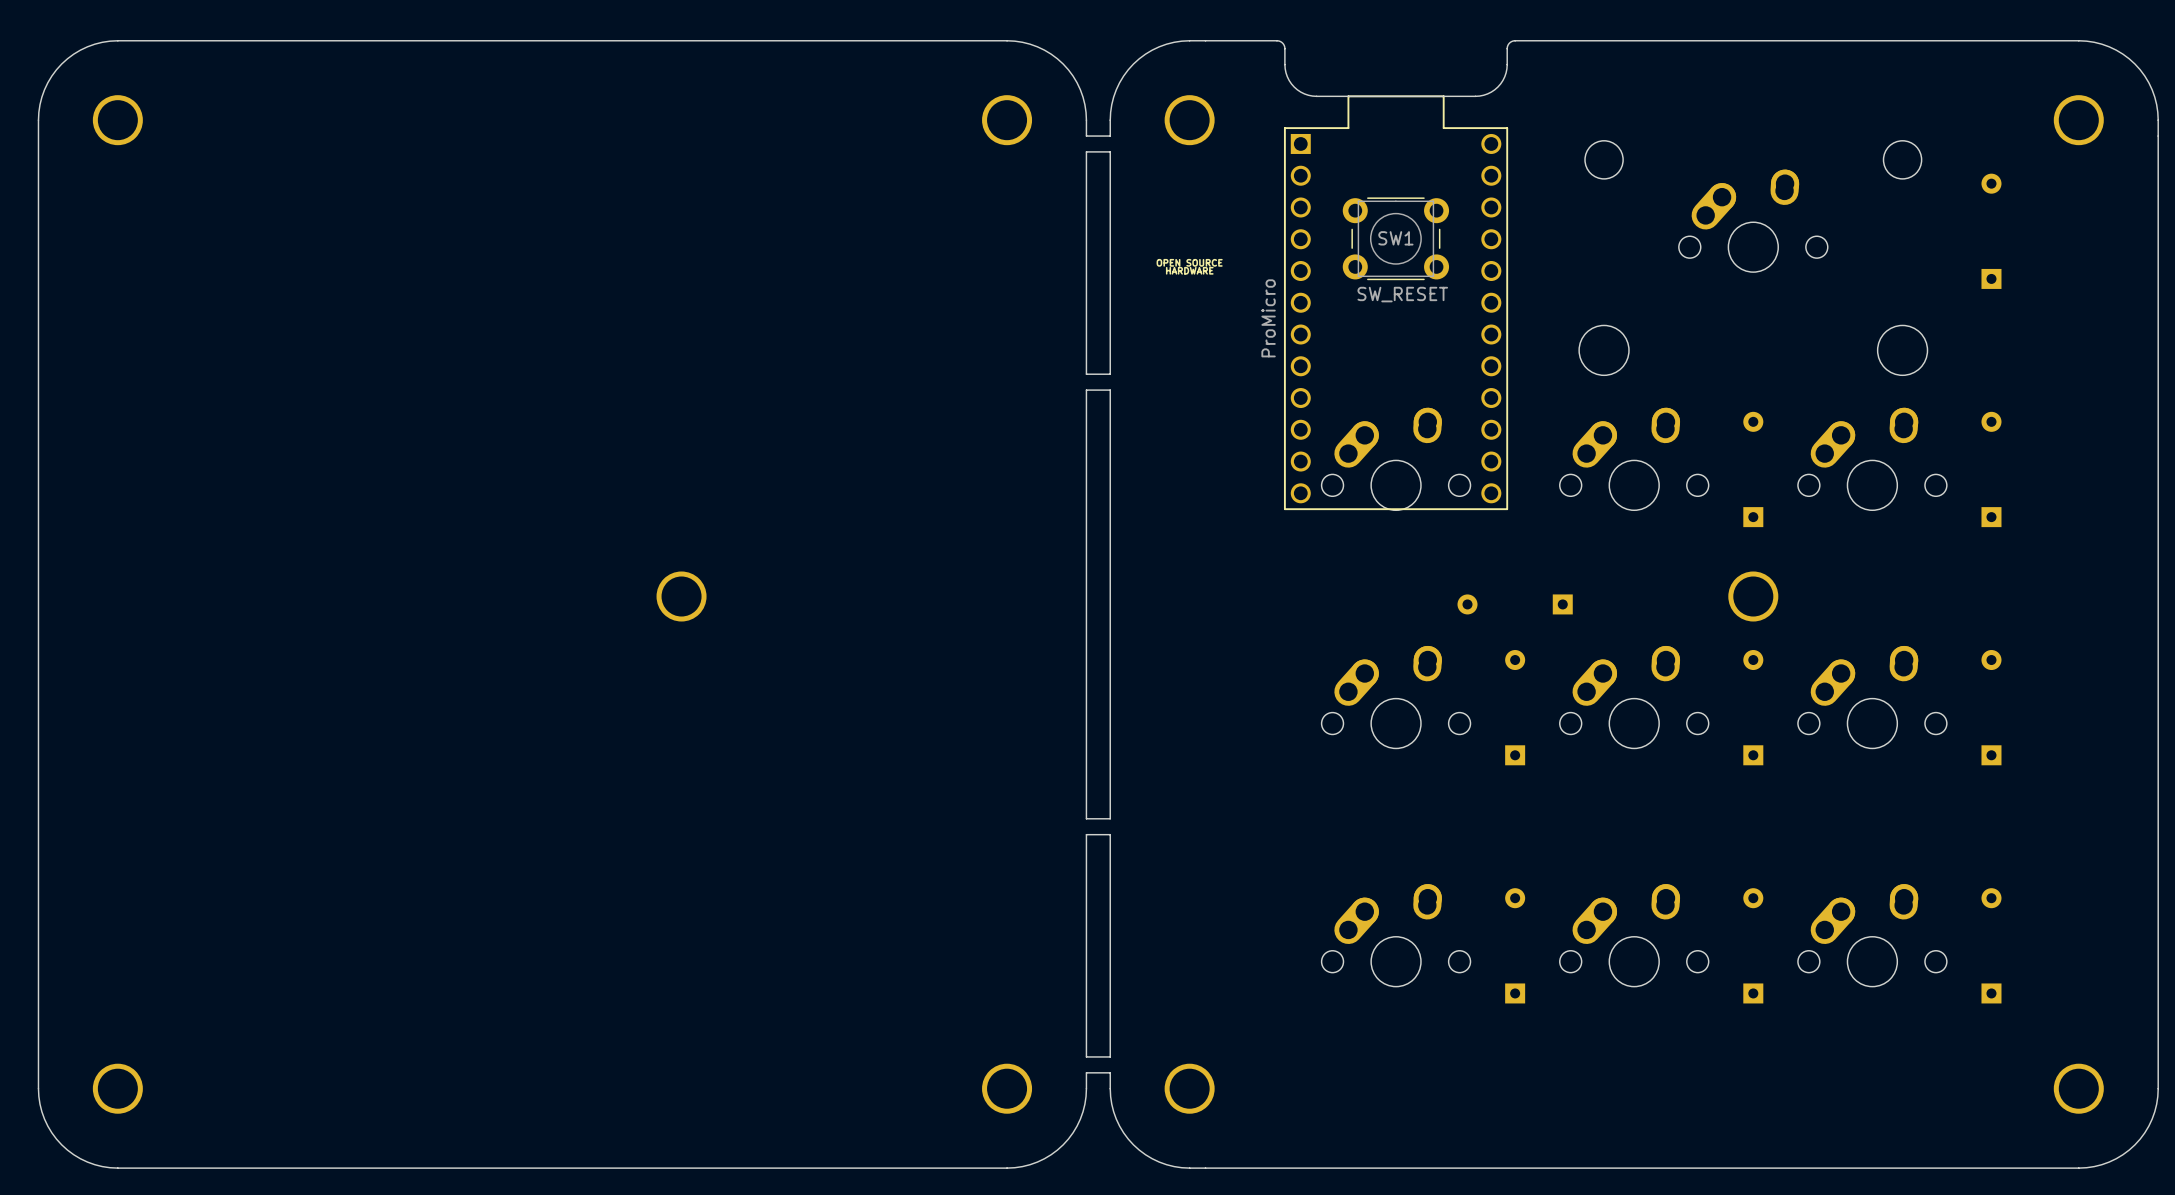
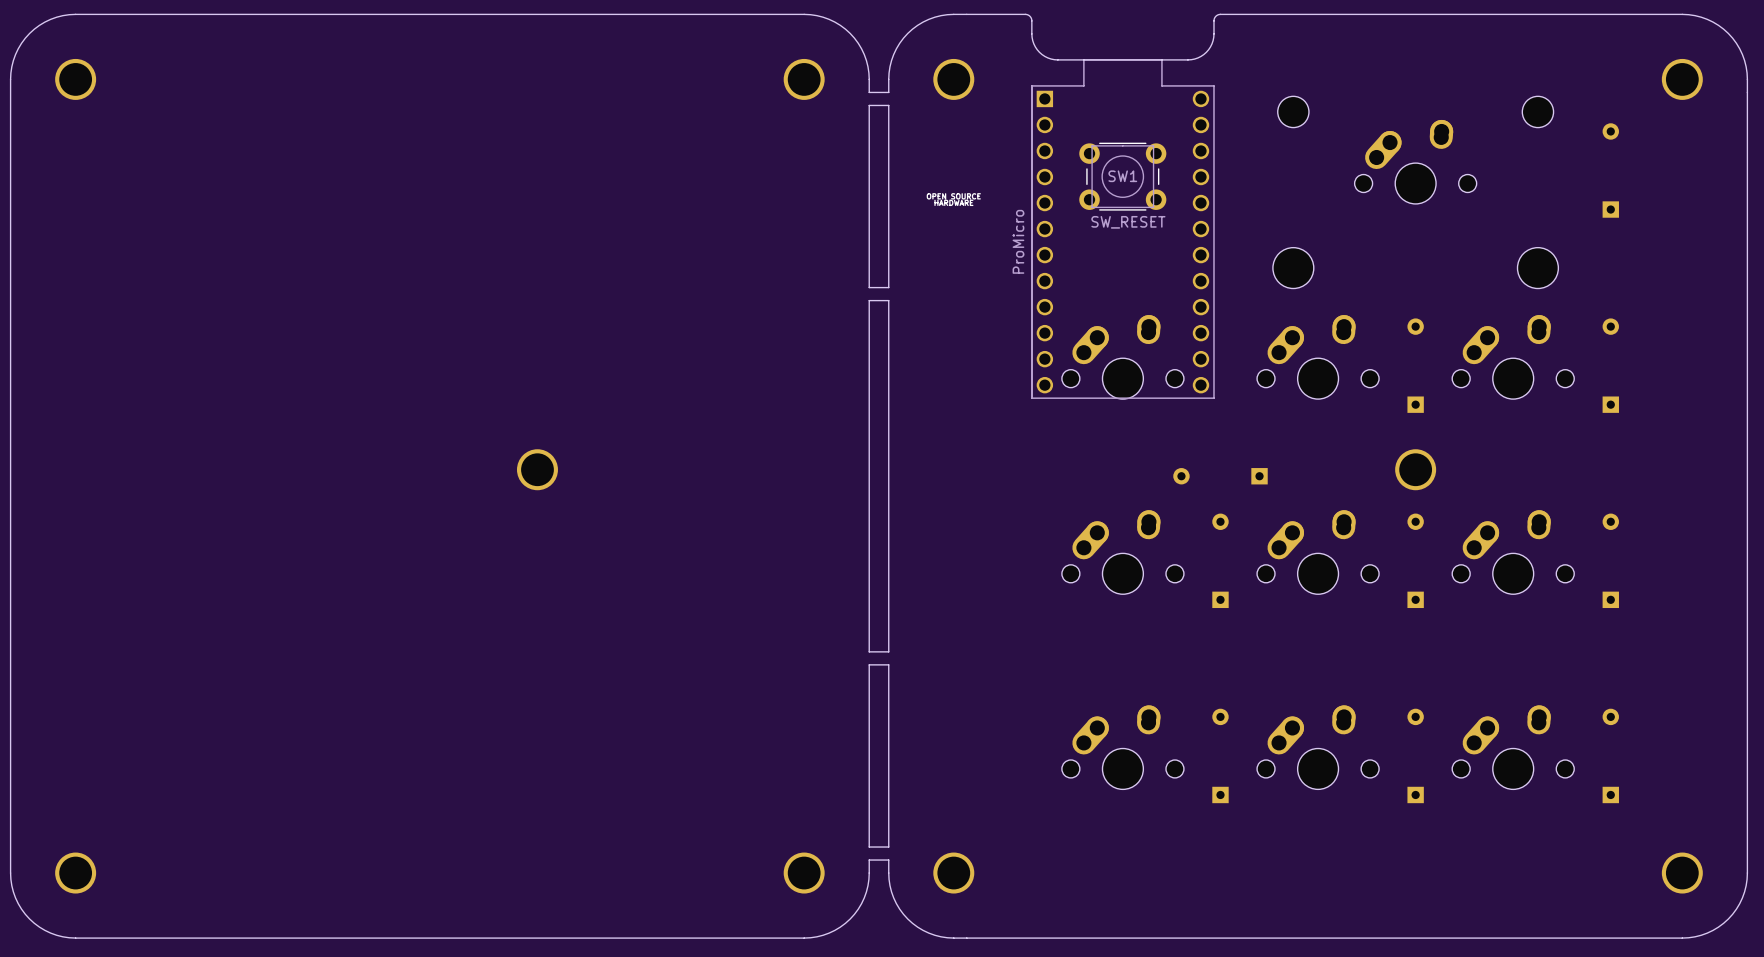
part footprint: [1283, 95, 1509, 511] -> [1031, 59, 1215, 399]

